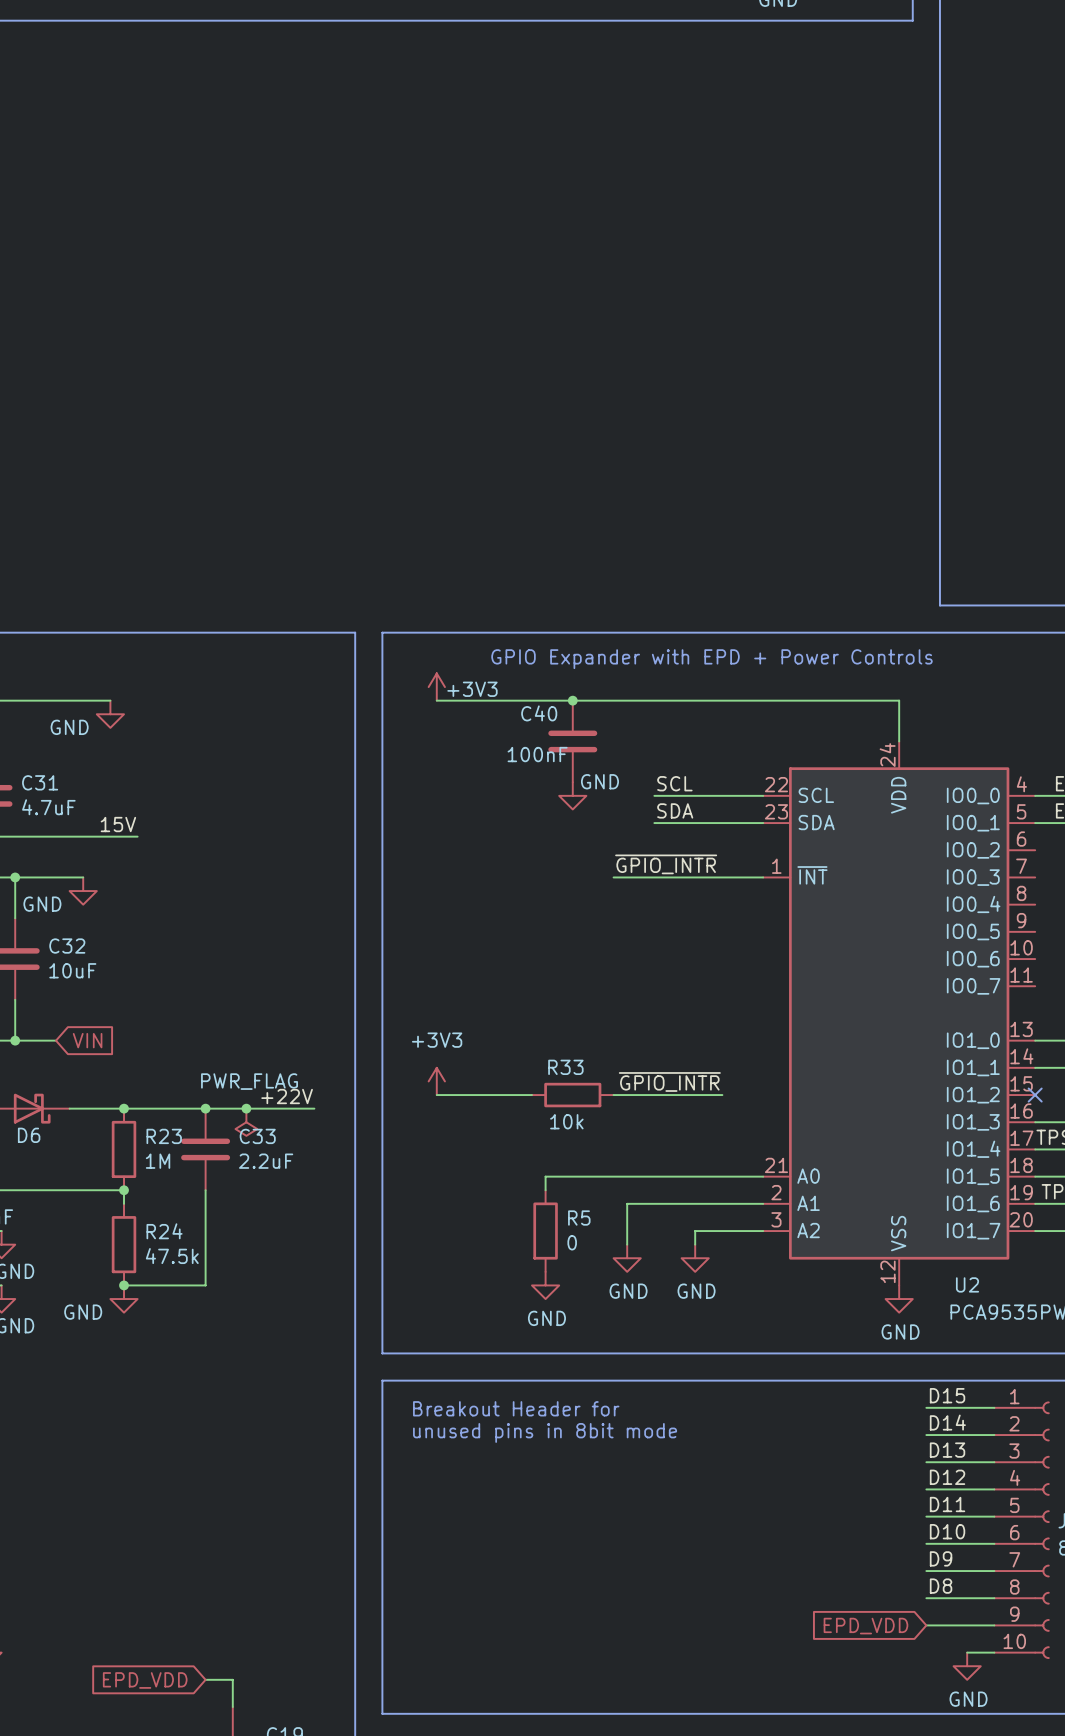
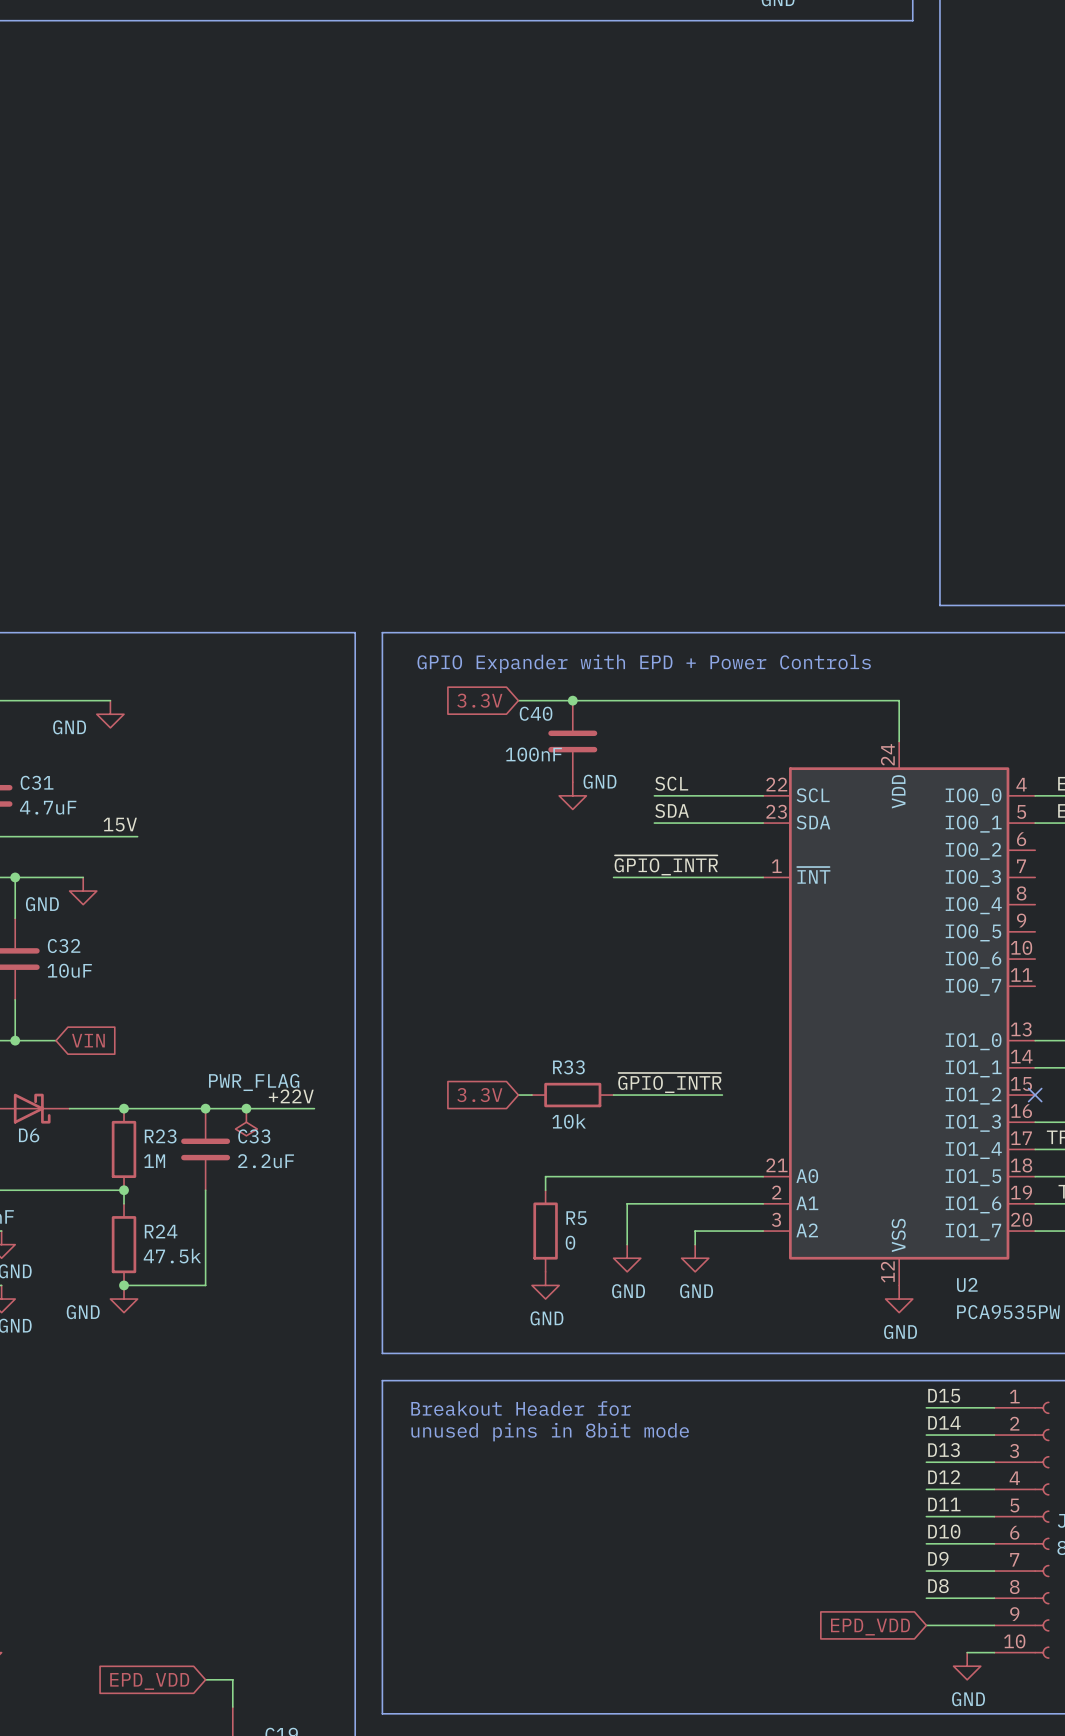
text position: GPIO Expander with EPD + Power Controls (711, 659) -> GPIO Expander with EPD + Power Controls (644, 663)
power symbol: +3V3 (436, 687) -> none
wire: (436, 700) (518, 700) -> none
global label: none -> 3.3V (479, 700)
power symbol: +3V3 (436, 1081) -> none
wire: (436, 1095) (518, 1095) -> none
global label: none -> 3.3V (479, 1095)

